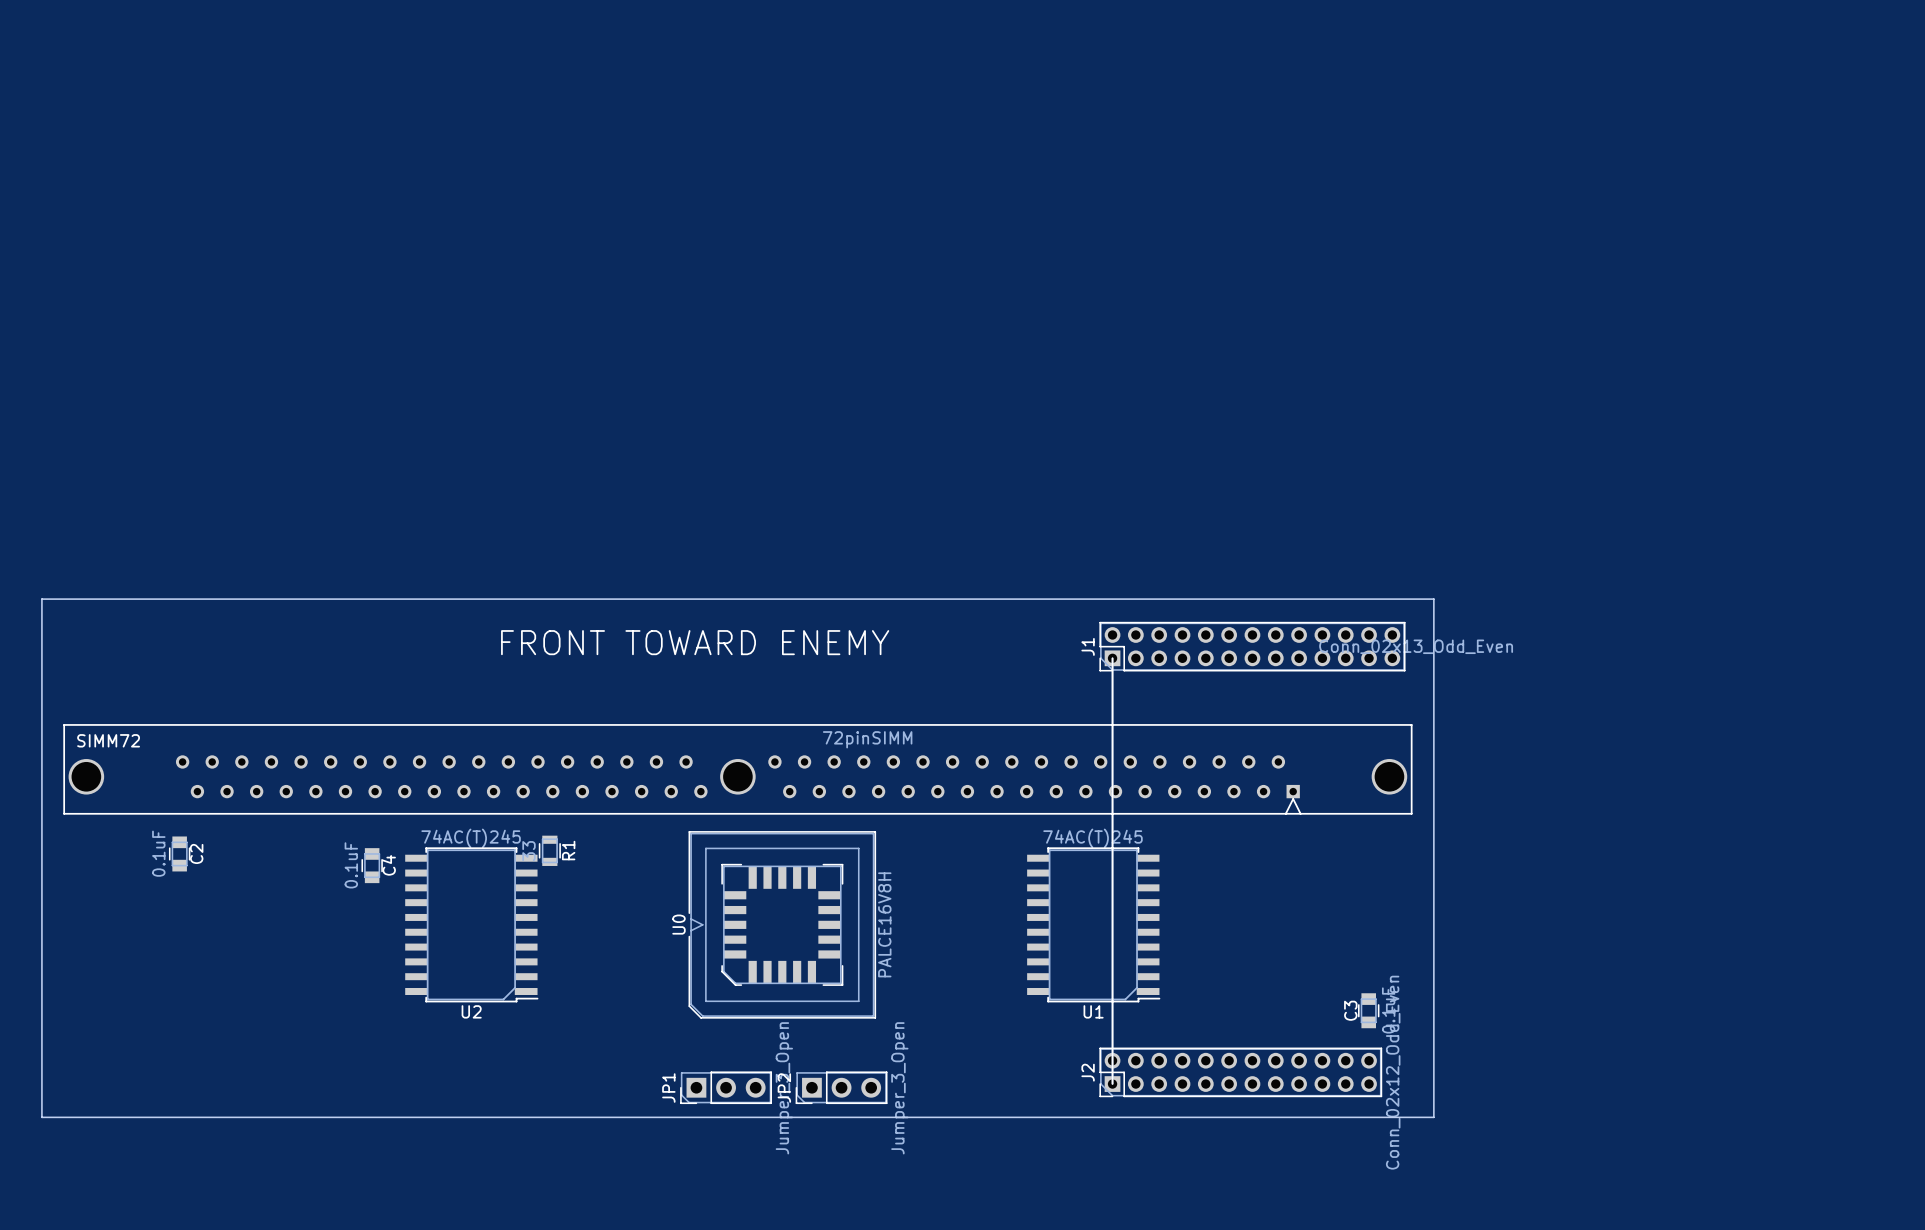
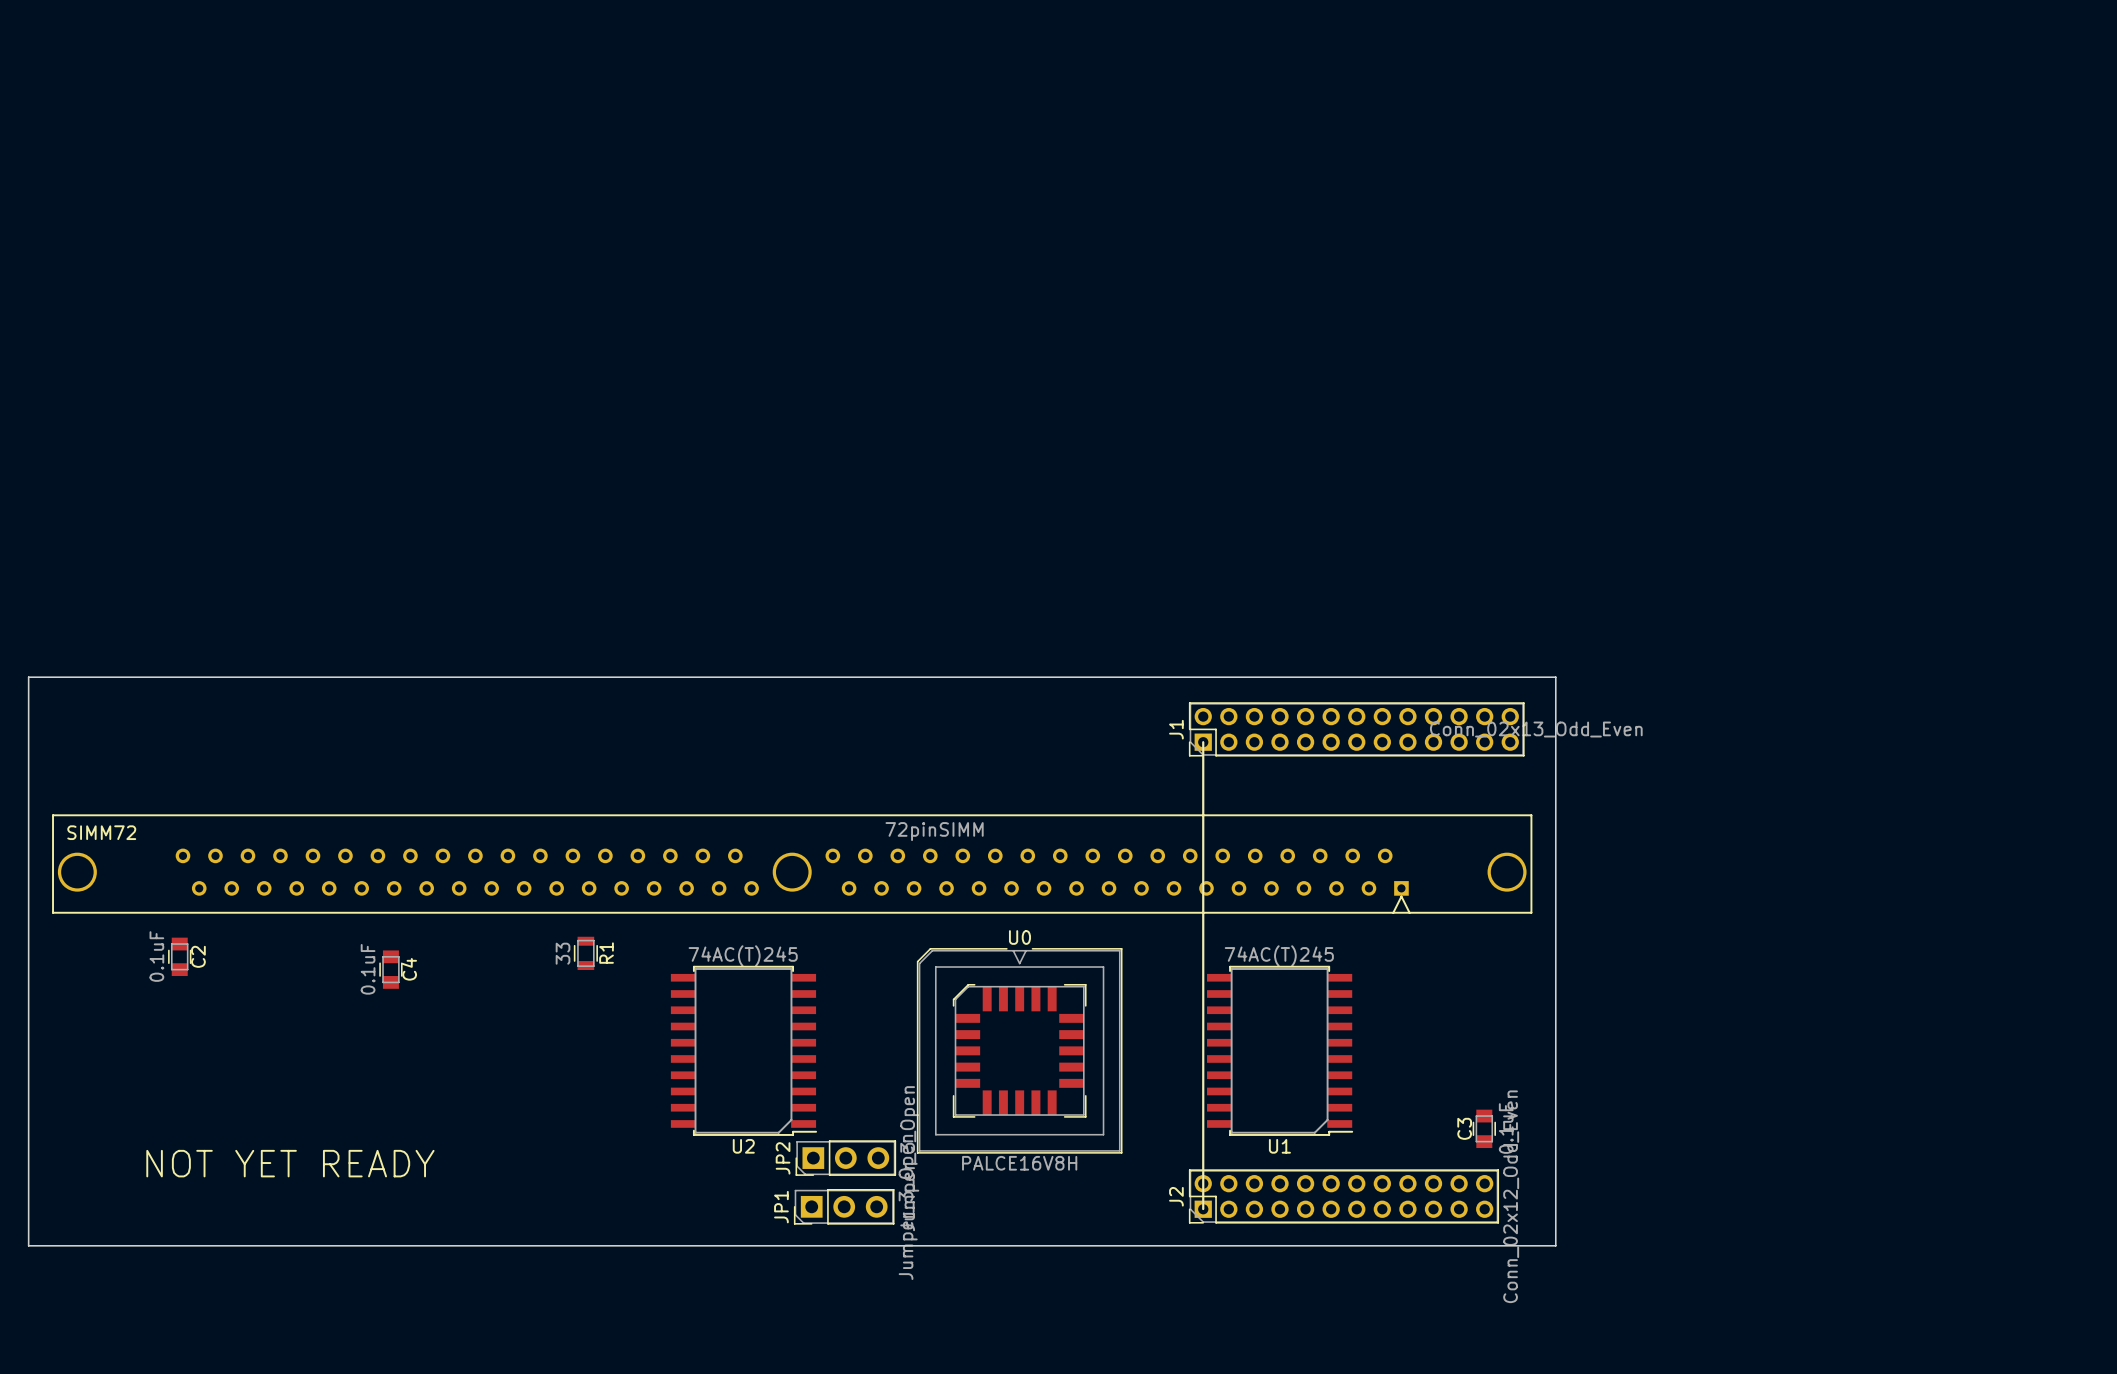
text: FRONT TOWARD ENEMY (695, 642) -> none
U2 position: (471, 924) -> (743, 1050)
U0 rotation: 0° (782, 924) -> 90° clockwise (1019, 1050)
U0 position: (782, 924) -> (1019, 1050)
U1 position: (1093, 924) -> (1280, 1050)
text: none -> NOT YET READY (290, 1163)
JP1 position: (726, 1087) -> (844, 1206)
JP2 position: (841, 1087) -> (845, 1158)

